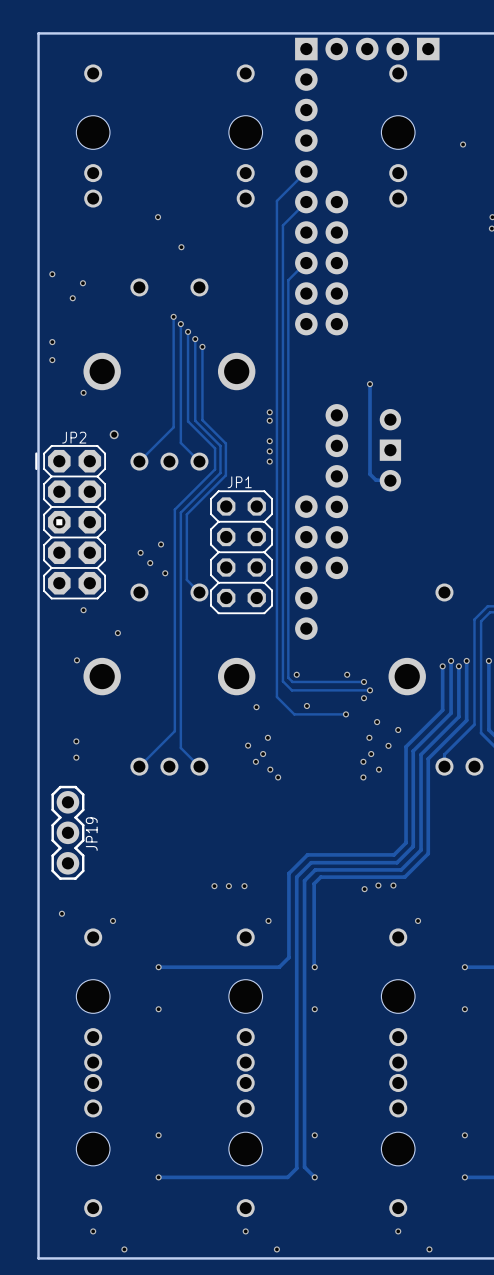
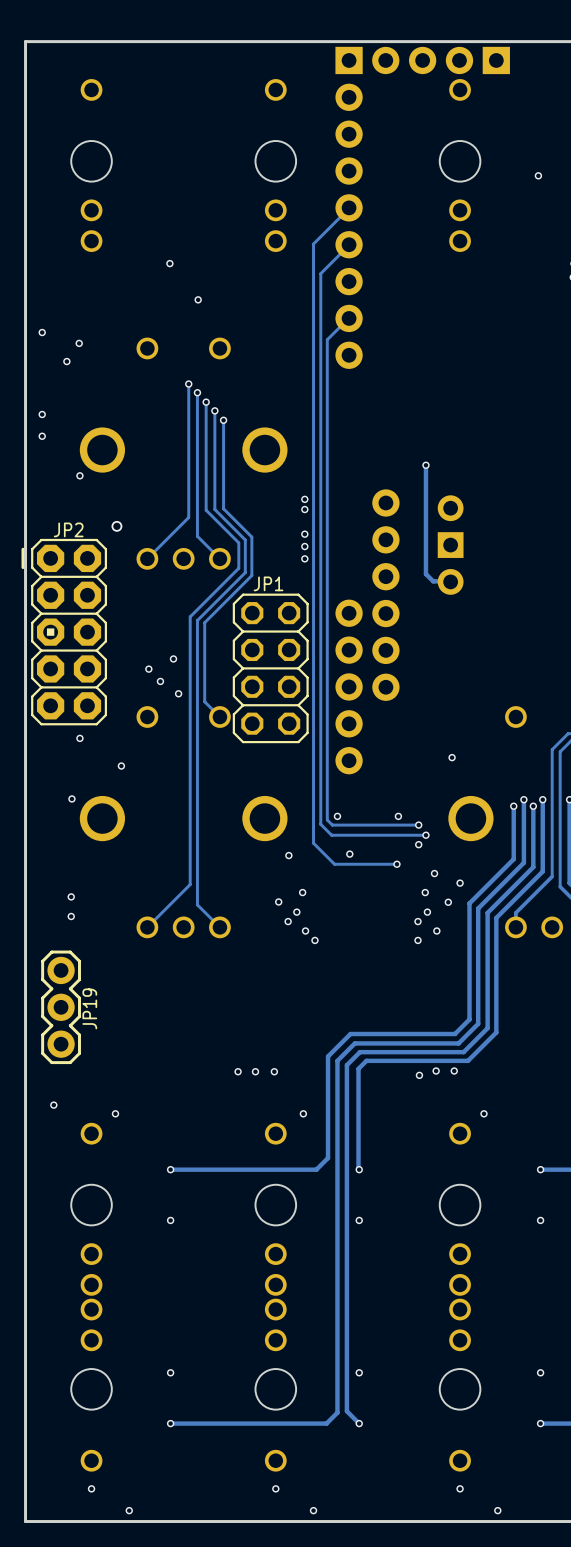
part: (306, 247) -> none
part position: (336, 263) -> (349, 281)
via: none -> (452, 757)

